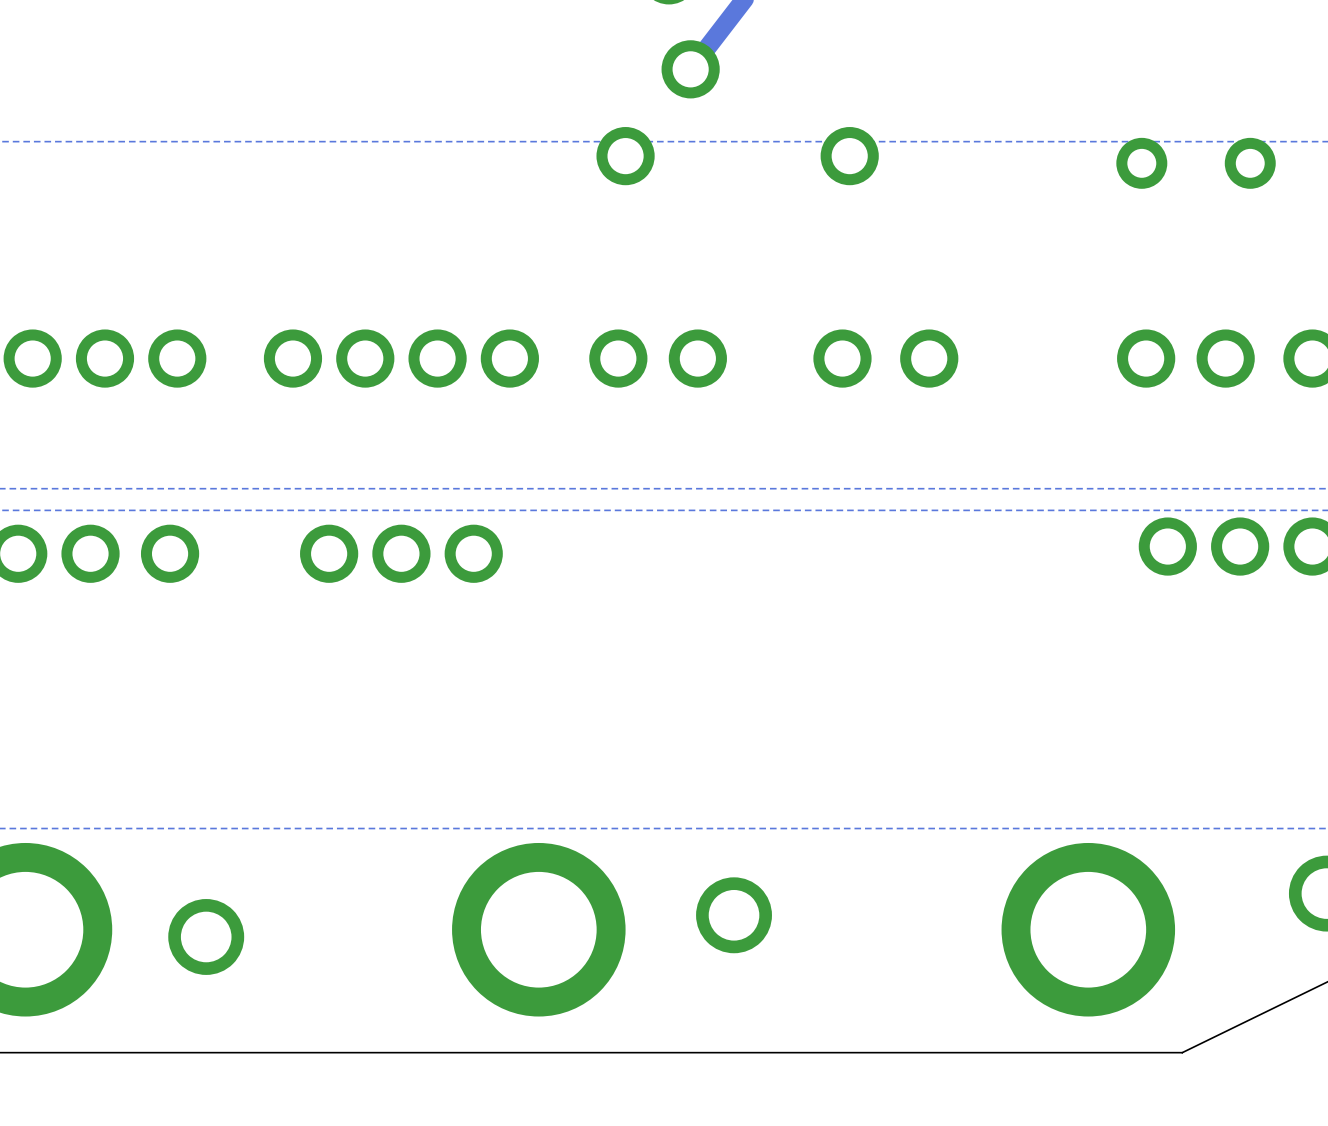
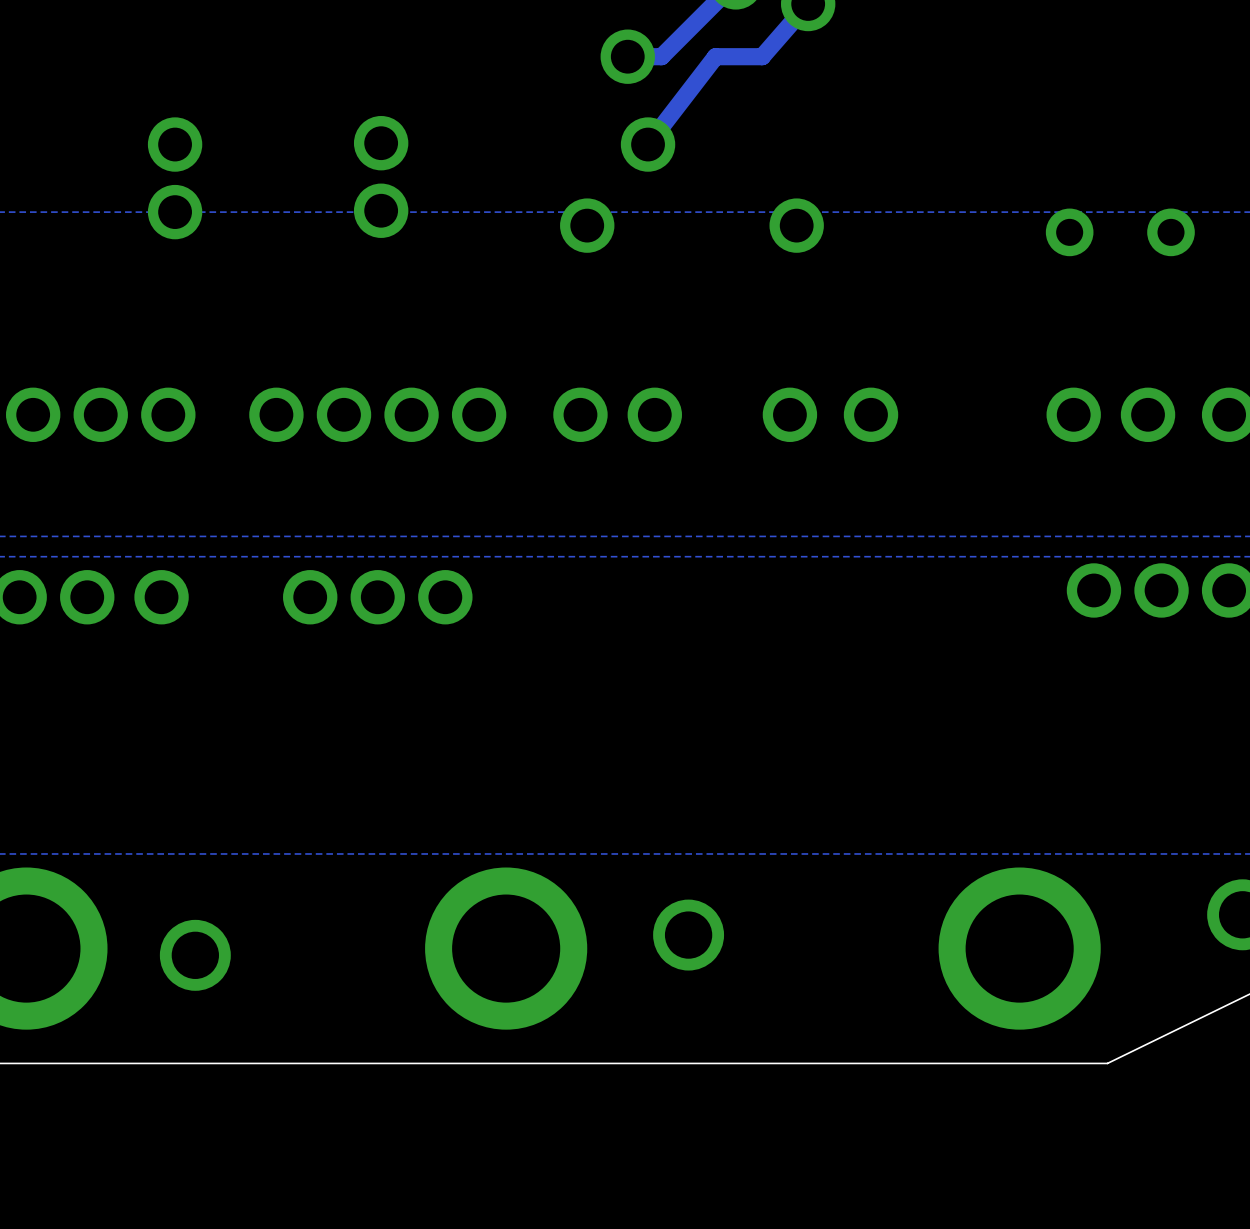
via: none -> (381, 143)
via: none -> (175, 144)
via: none -> (381, 210)
via: none -> (175, 212)

